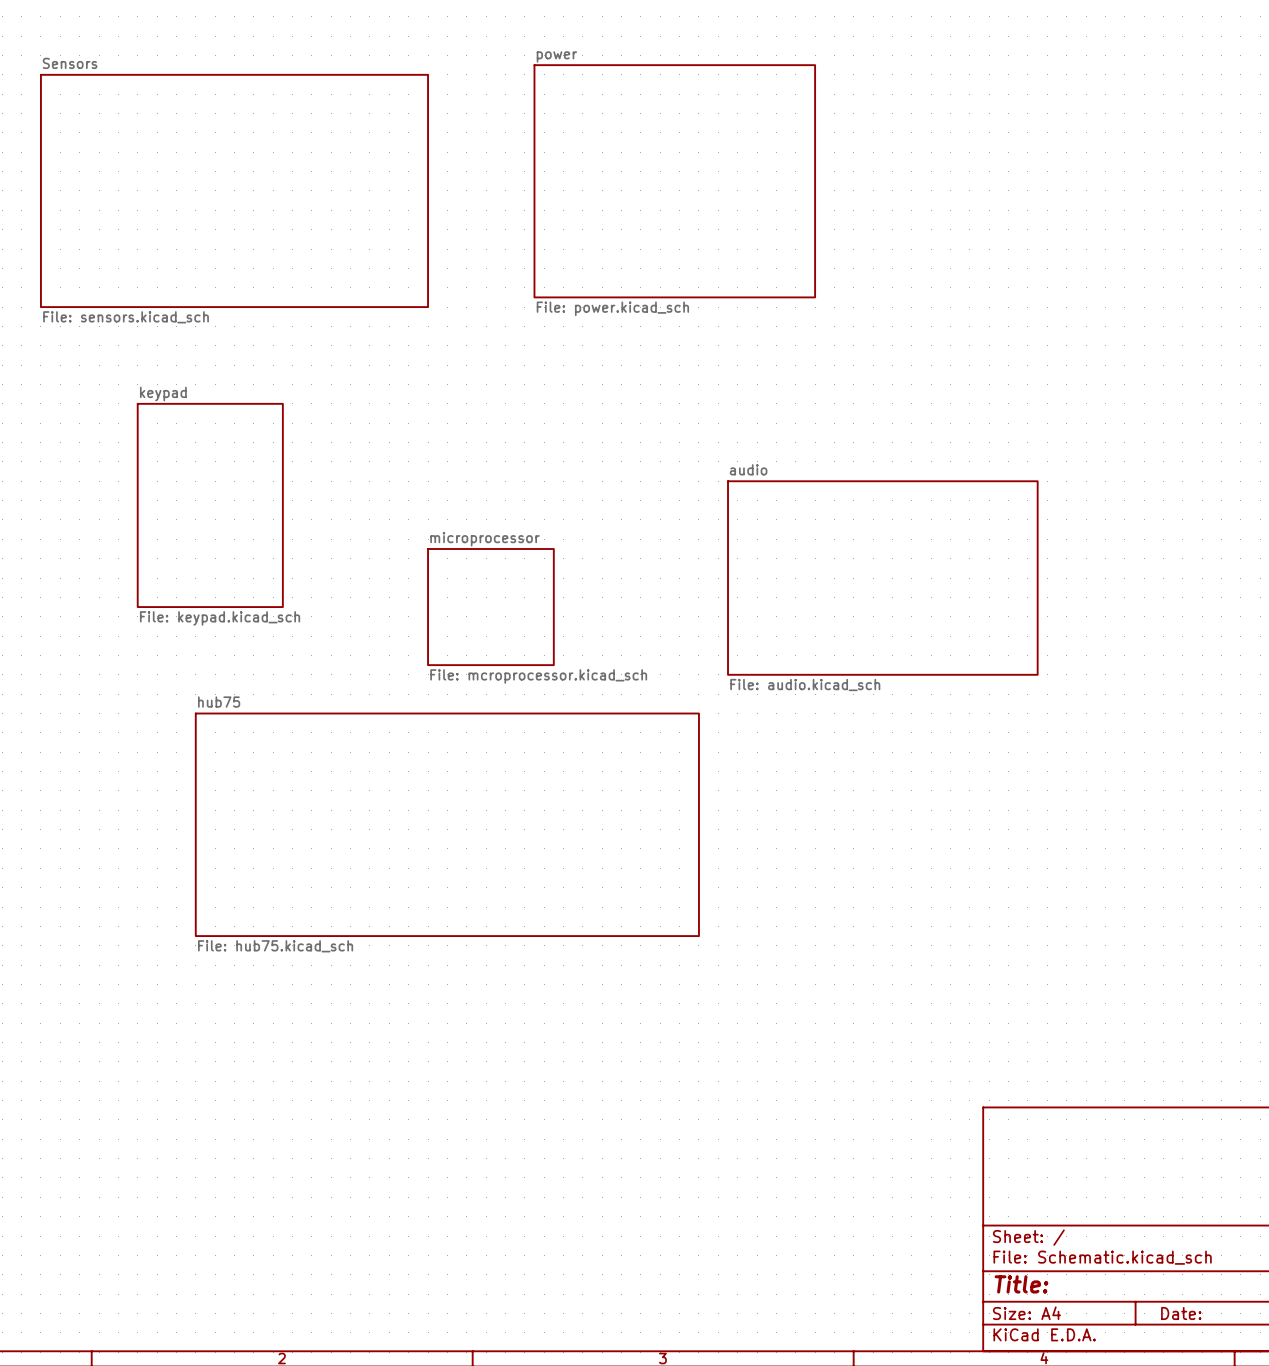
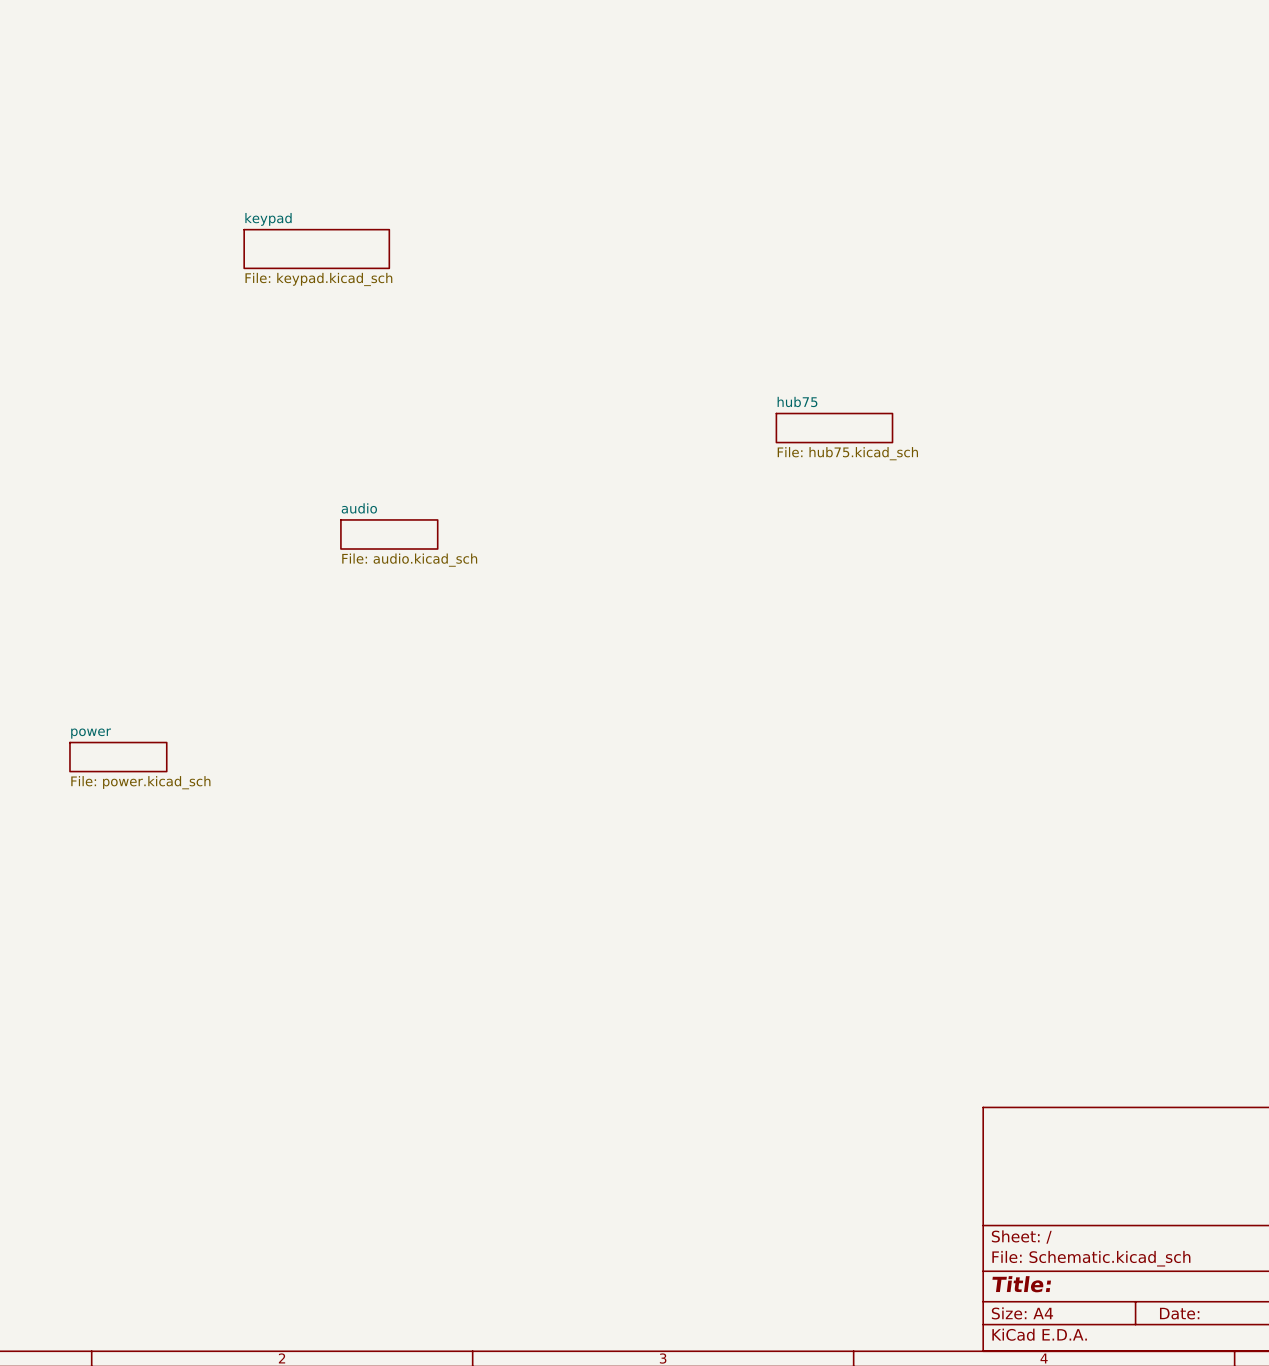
sheet power: File: power.kicad_sch (674, 181) -> none
sheet Sensors: File: sensors.kicad_sch (234, 190) -> none
sheet keypad: none -> File: keypad.kicad_sch (316, 249)
sheet keypad: File: keypad.kicad_sch (210, 505) -> none
sheet audio: none -> File: audio.kicad_sch (389, 534)
sheet audio: File: audio.kicad_sch (882, 578) -> none
sheet microprocessor: File: mcroprocessor.kicad_sch (490, 607) -> none
sheet hub75 name position: hub75 (219, 702) -> hub75 (797, 401)
sheet hub75 shape: [195, 712, 700, 937] -> [775, 412, 894, 444]
sheet power: none -> File: power.kicad_sch (118, 757)
sheet hub75 value position: File: hub75.kicad_sch (275, 946) -> File: hub75.kicad_sch (847, 453)

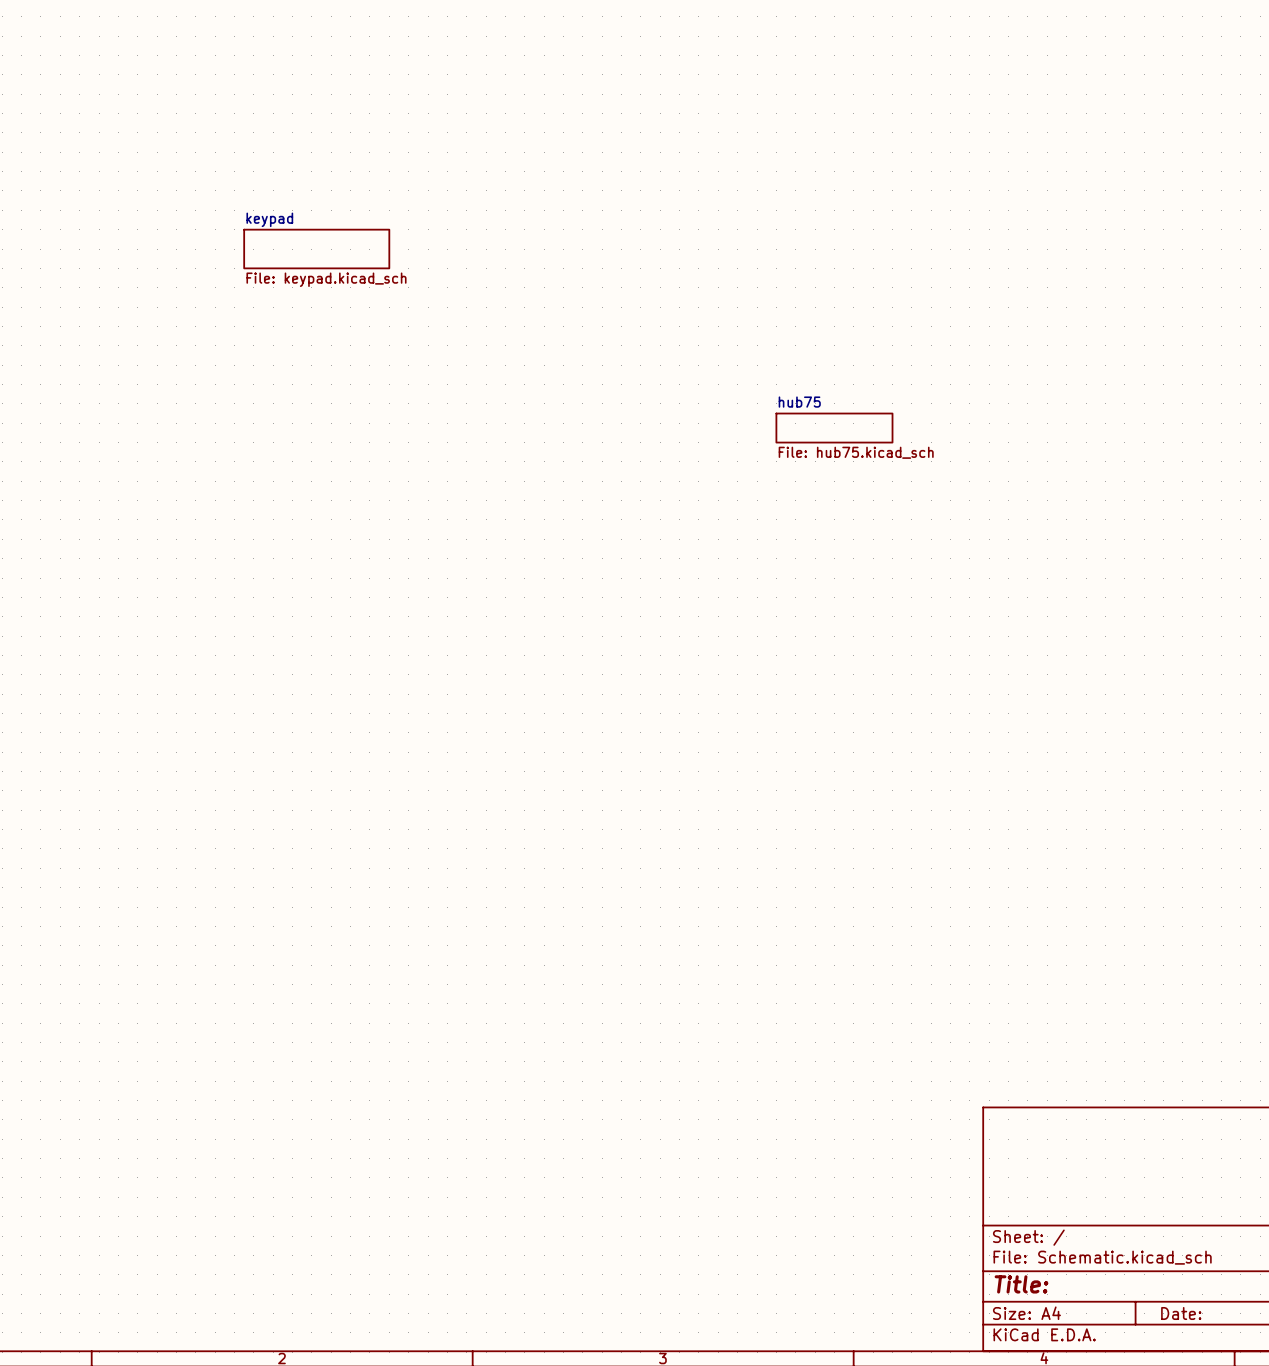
sheet audio: File: audio.kicad_sch (389, 534) -> none
sheet power: File: power.kicad_sch (118, 757) -> none

